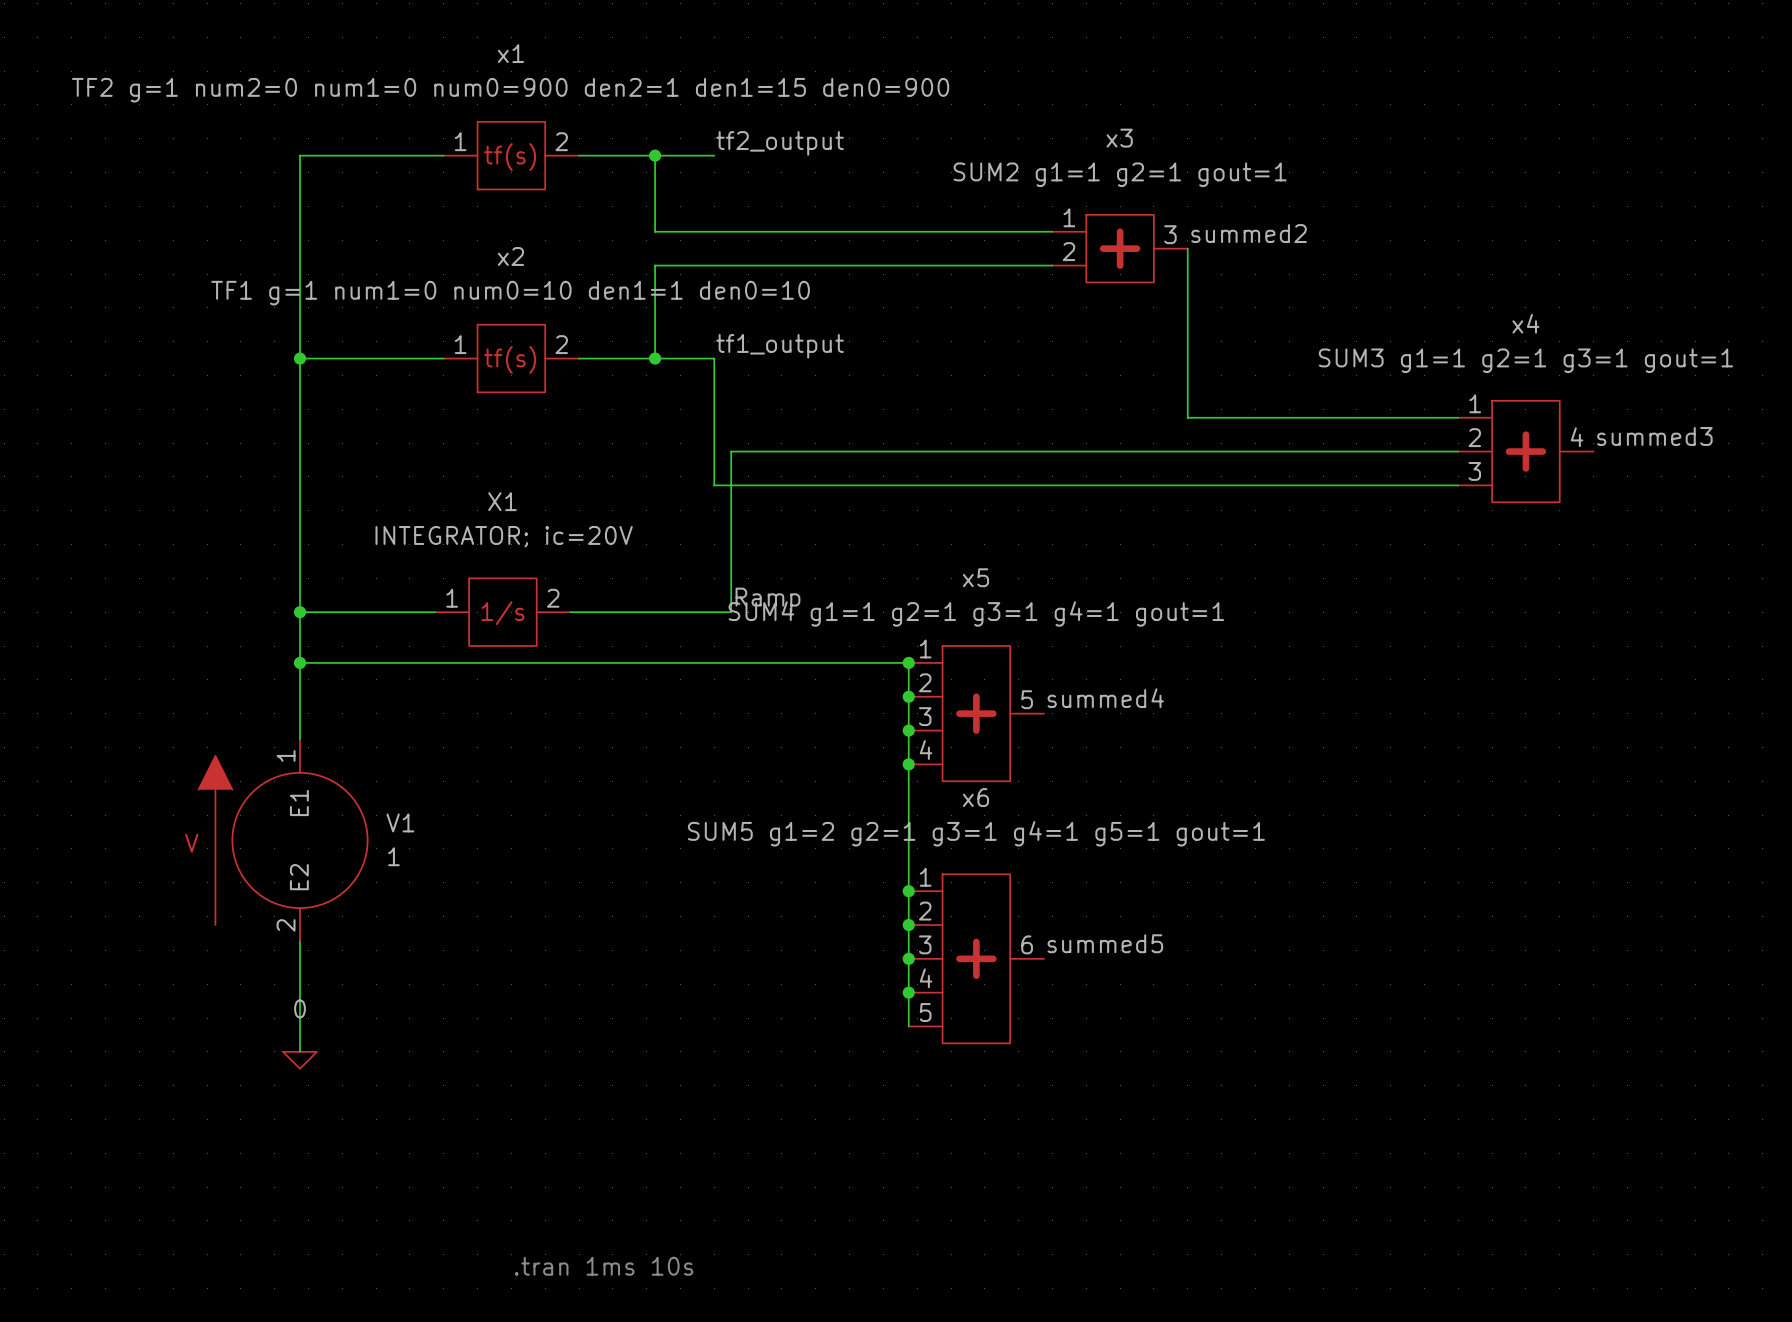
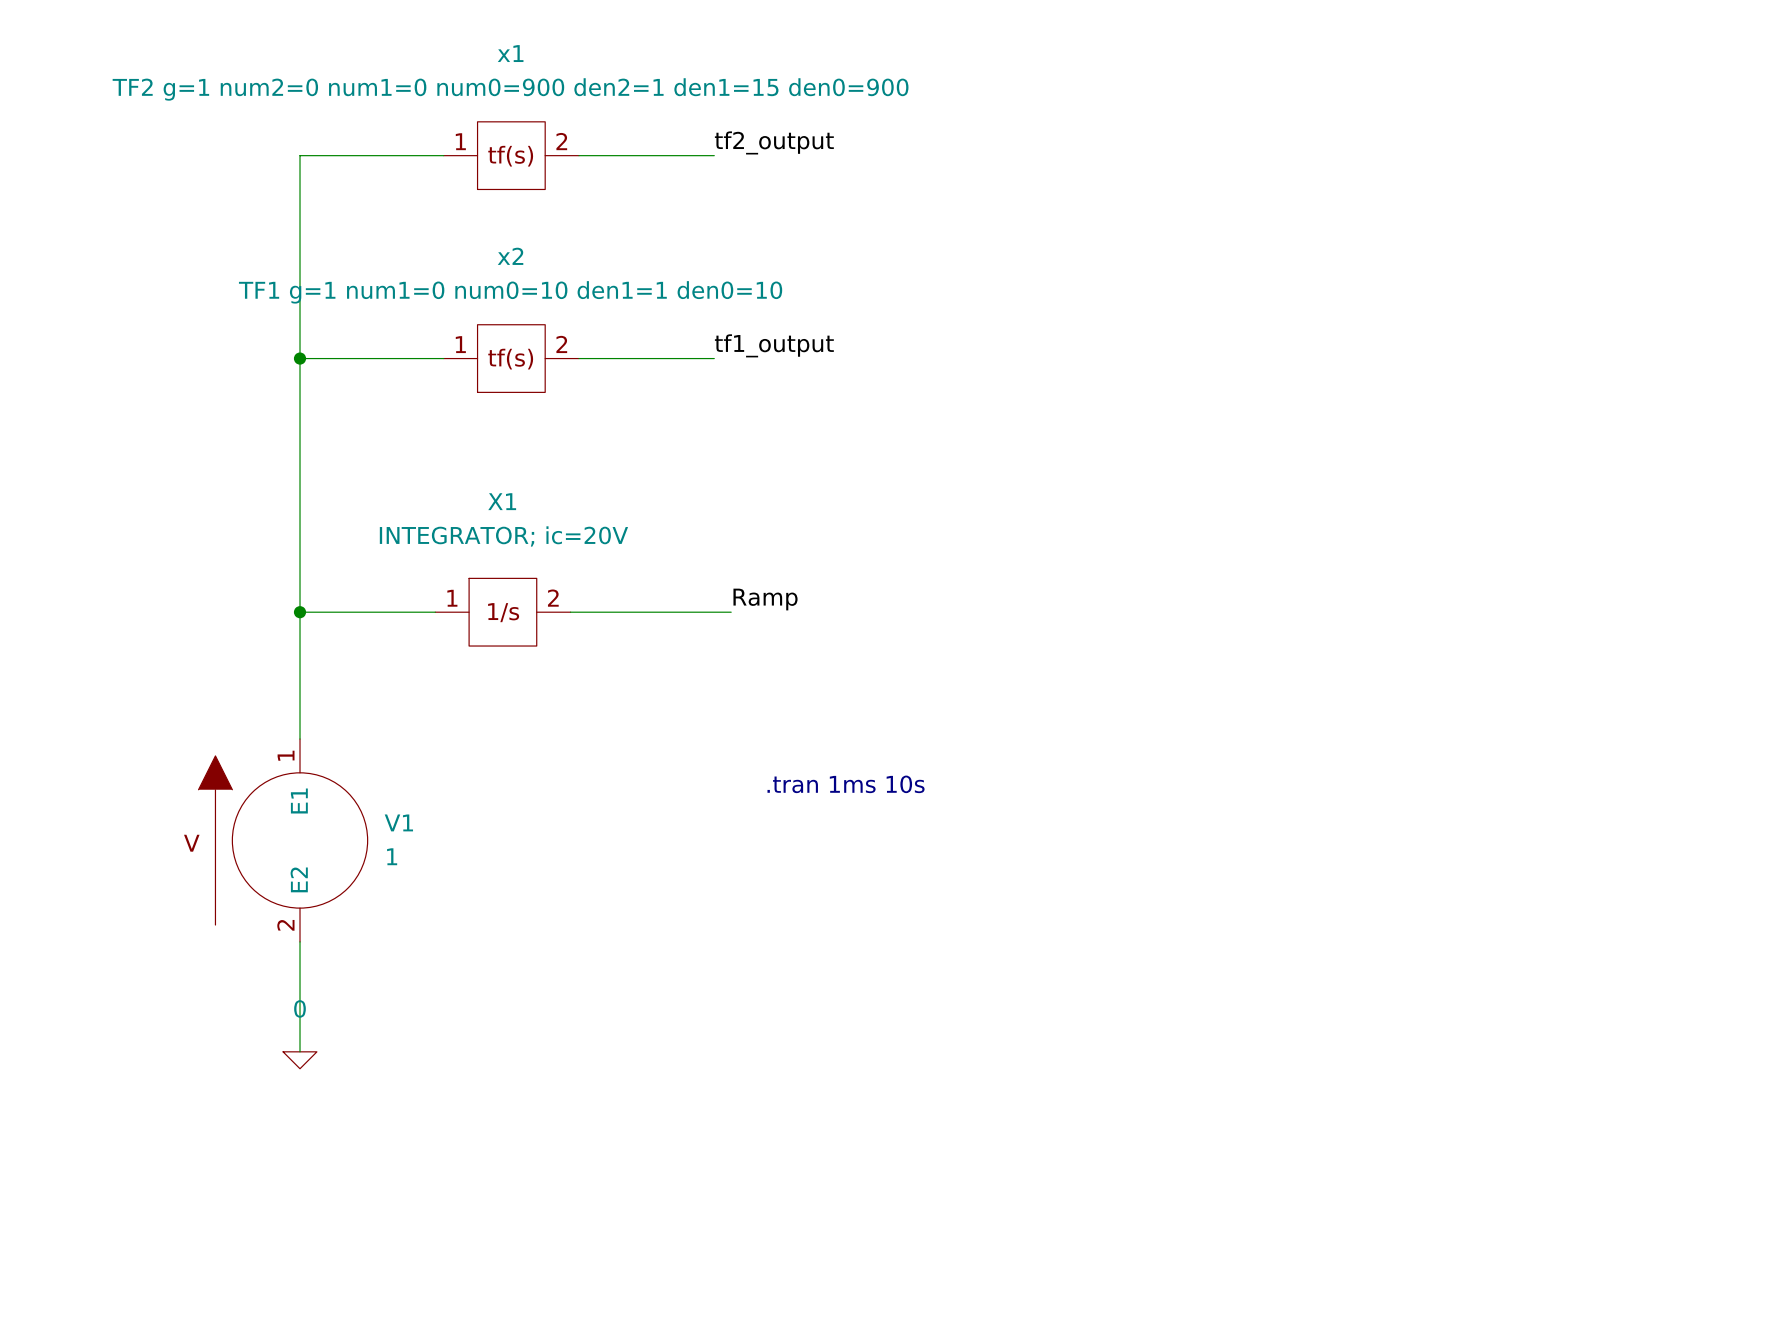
wire: (655, 155) (655, 231) (1052, 231) -> none
junction: (655, 155) -> none
label: summed2 (1249, 233) -> none
x3: (1120, 248) -> none
wire: (1187, 248) (1187, 417) (1458, 417) -> none
wire: (1052, 265) (655, 265) (655, 358) -> none
junction: (655, 358) -> none
wire: (714, 358) (714, 485) (1458, 485) -> none
label: summed3 (1654, 436) -> none
wire: (1458, 451) (731, 451) (731, 612) -> none
x4: (1525, 451) -> none
wire: (300, 662) (908, 662) (908, 1026) -> none
junction: (300, 662) -> none
junction: (908, 662) -> none
junction: (908, 696) -> none
label: summed4 (1105, 698) -> none
x5: (976, 713) -> none
junction: (908, 730) -> none
junction: (908, 764) -> none
text: none -> .tran 1ms 10s (846, 784)
junction: (908, 891) -> none
junction: (908, 925) -> none
label: summed5 (1105, 943) -> none
junction: (908, 958) -> none
x6: (976, 958) -> none
junction: (908, 992) -> none
text: .tran 1ms 10s (604, 1266) -> none

